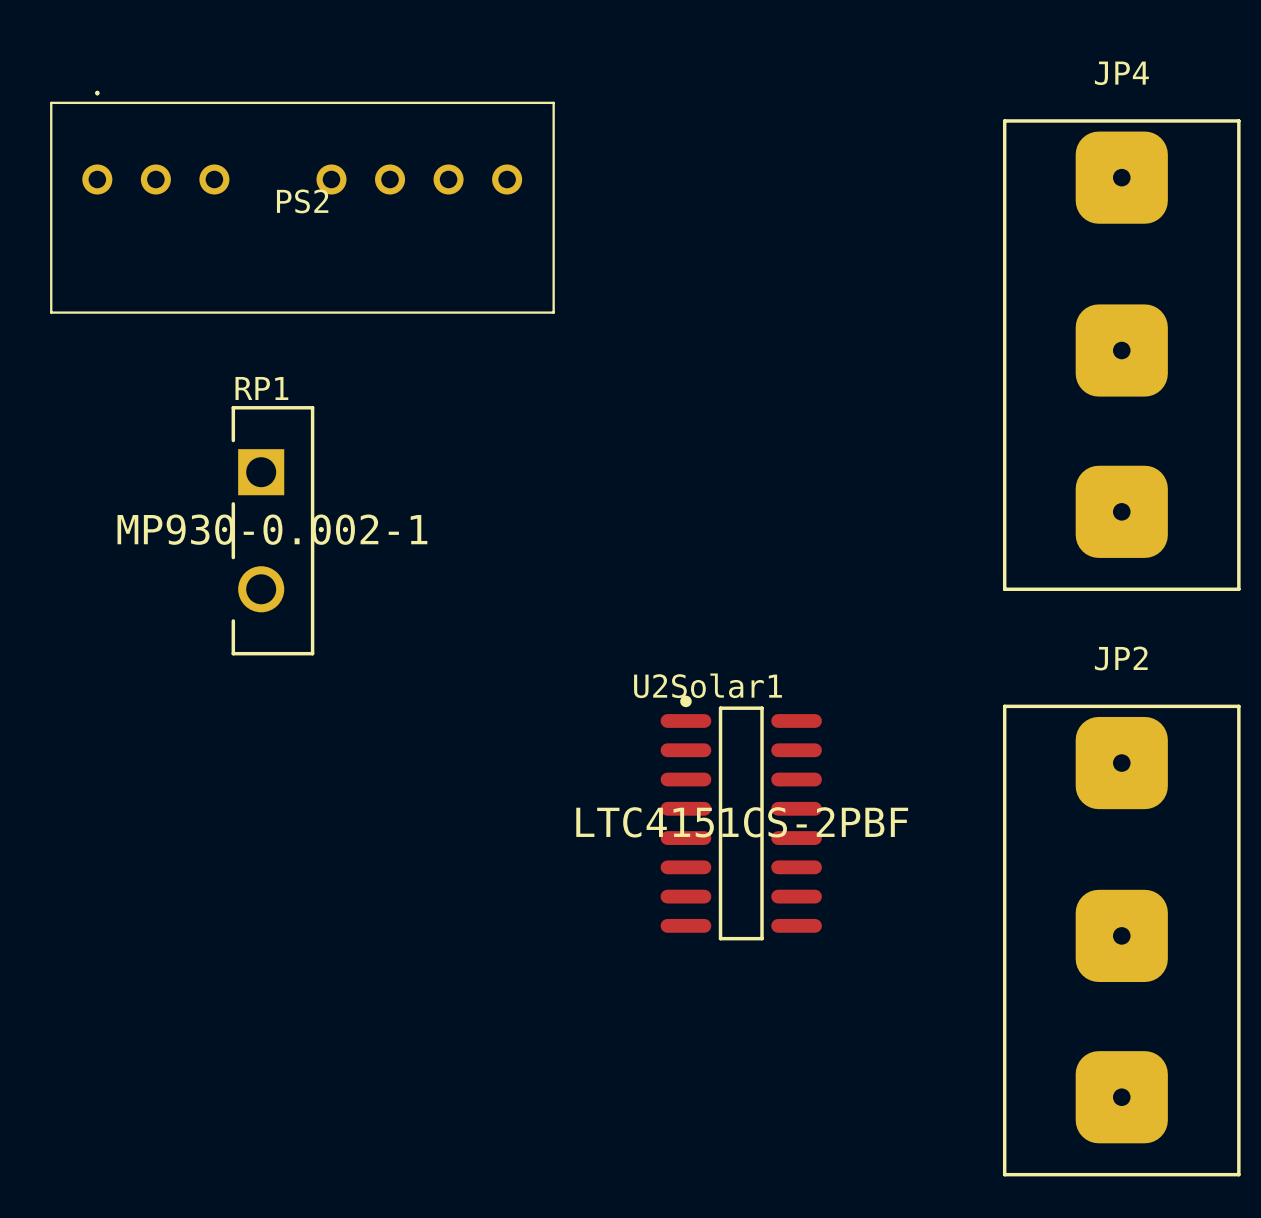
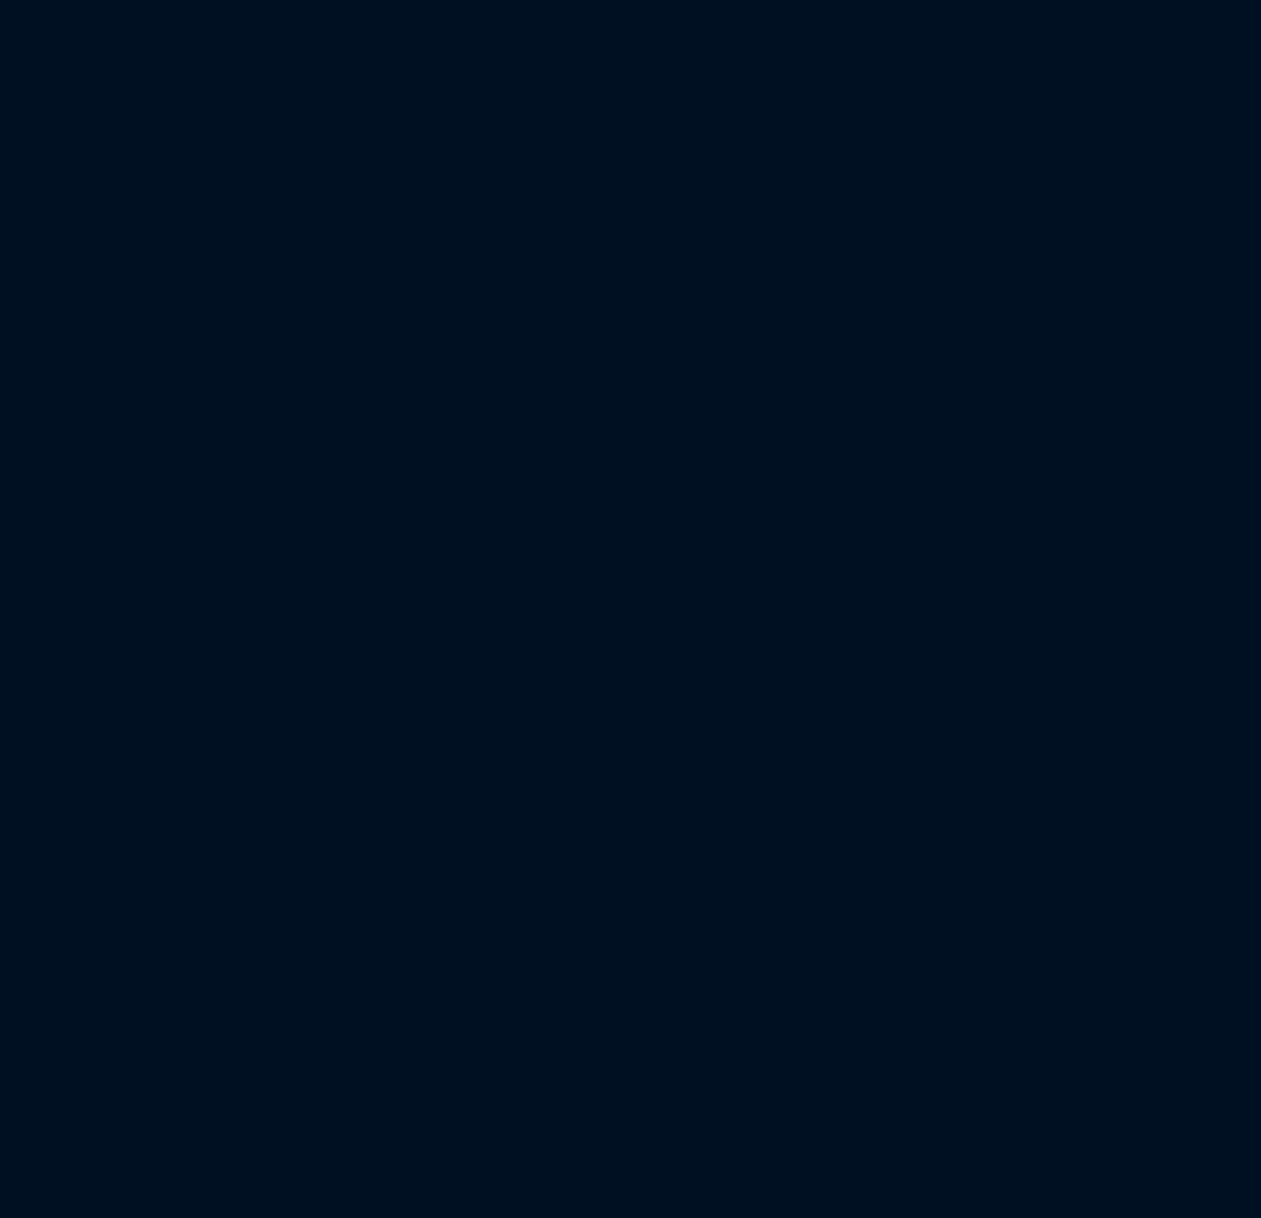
PS2: (302, 202) -> none
JP4: (1121, 355) -> none
RP1: MP930-0.002-1 (272, 530) -> none
U2Solar1: LTC4151CS-2PBF (741, 818) -> none
JP2: (1121, 940) -> none

